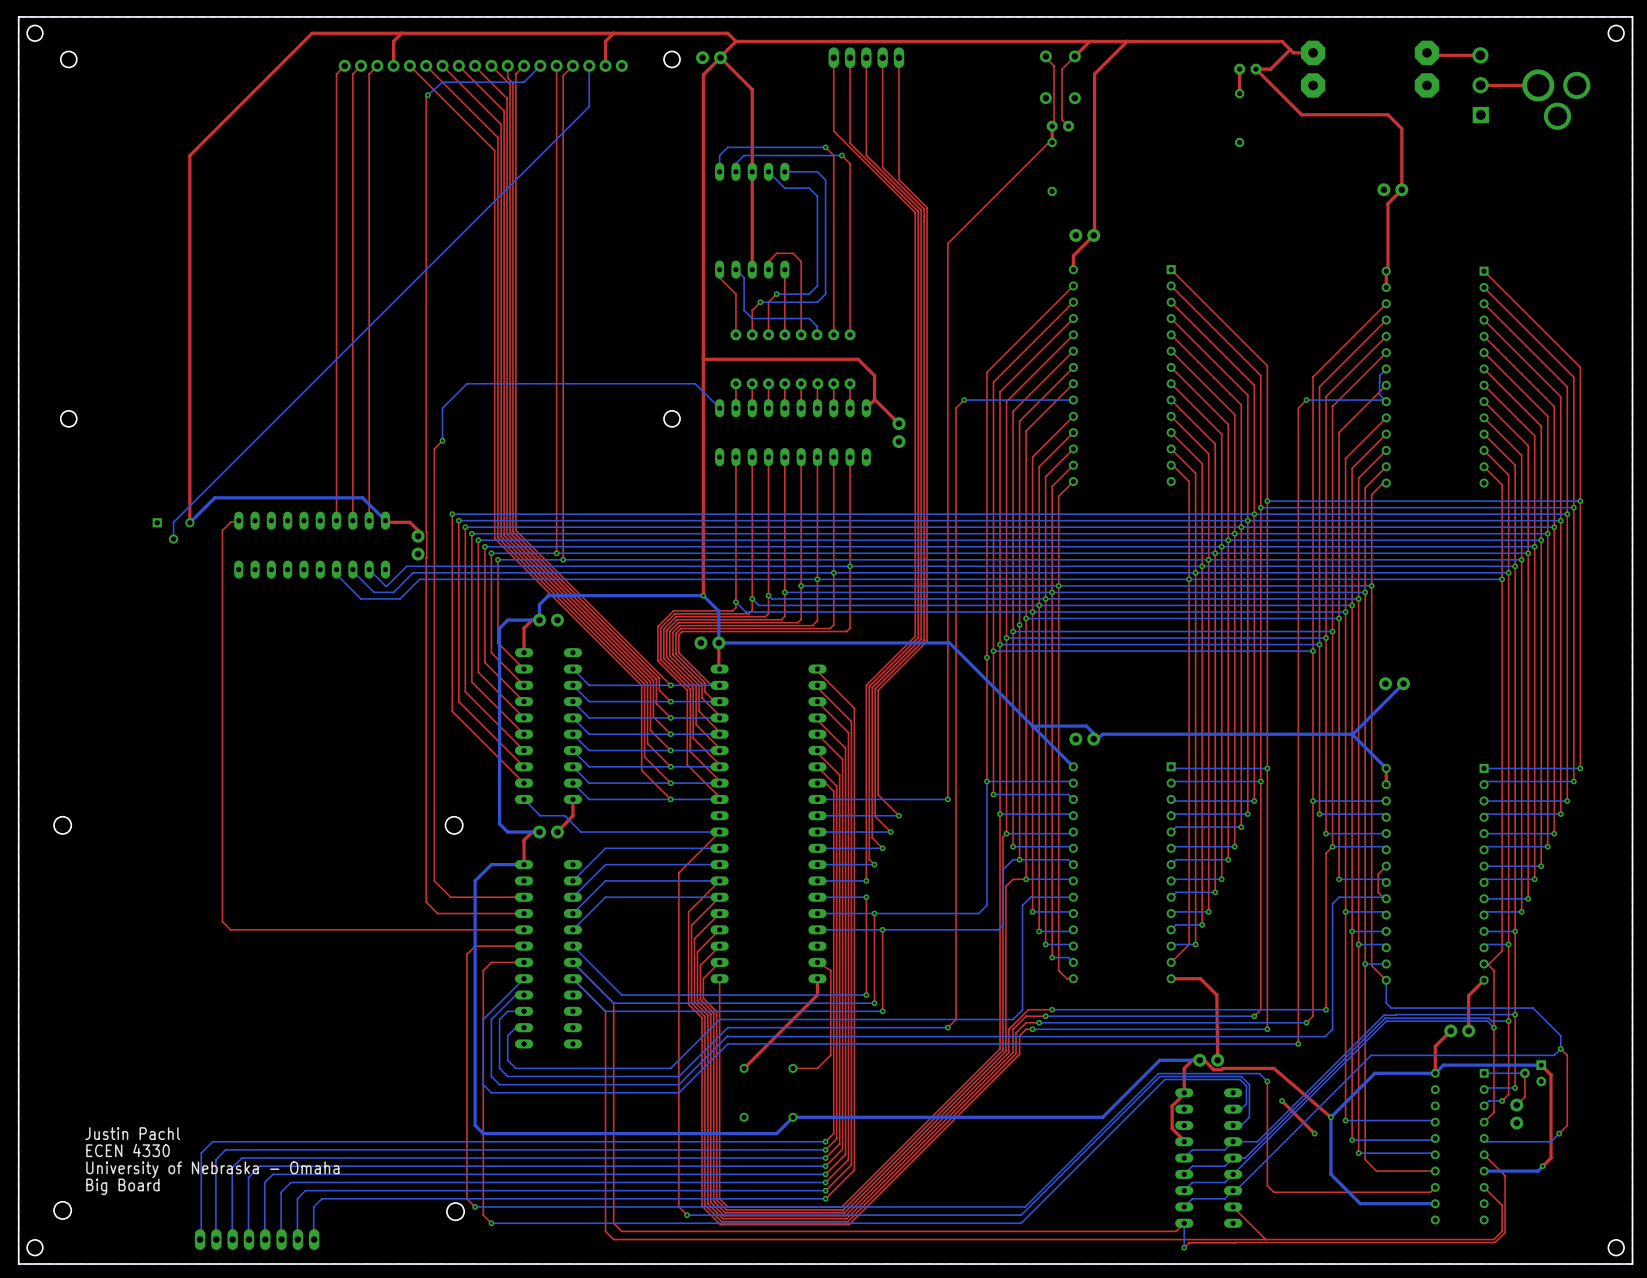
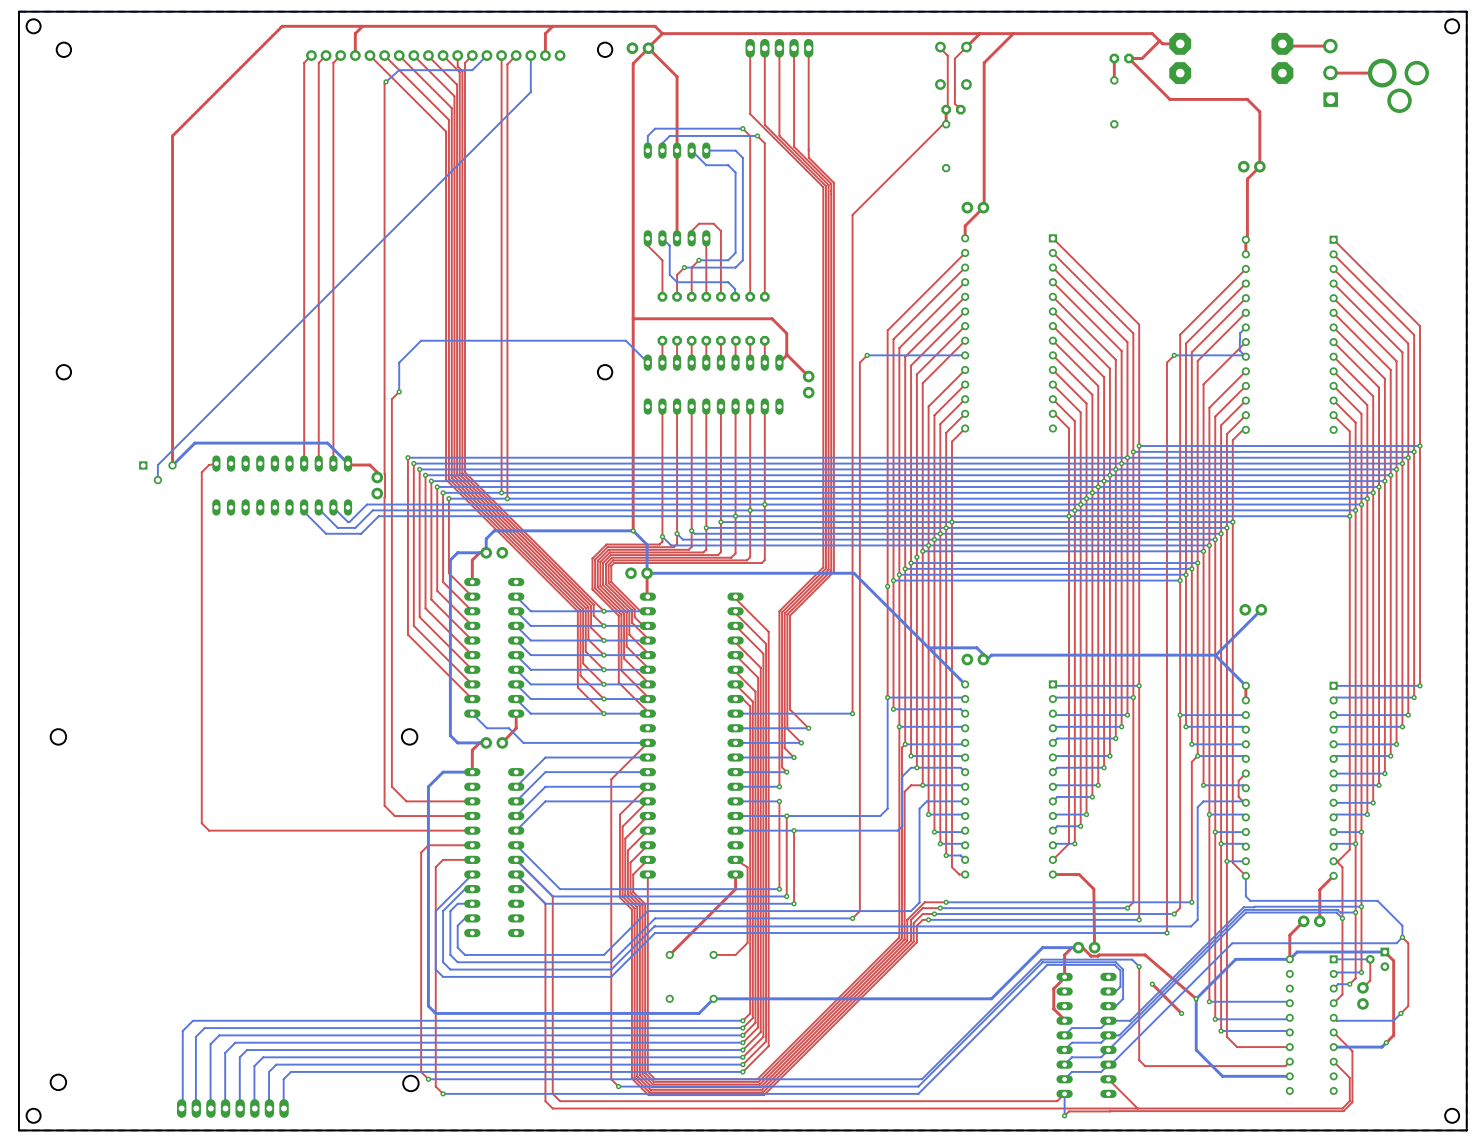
text: Justin Pachl (132, 1133) -> none
text: ECEN 4330 (128, 1150) -> none
text: University of Nebraska - Omaha (212, 1169) -> none
text: Big Board (122, 1186) -> none

